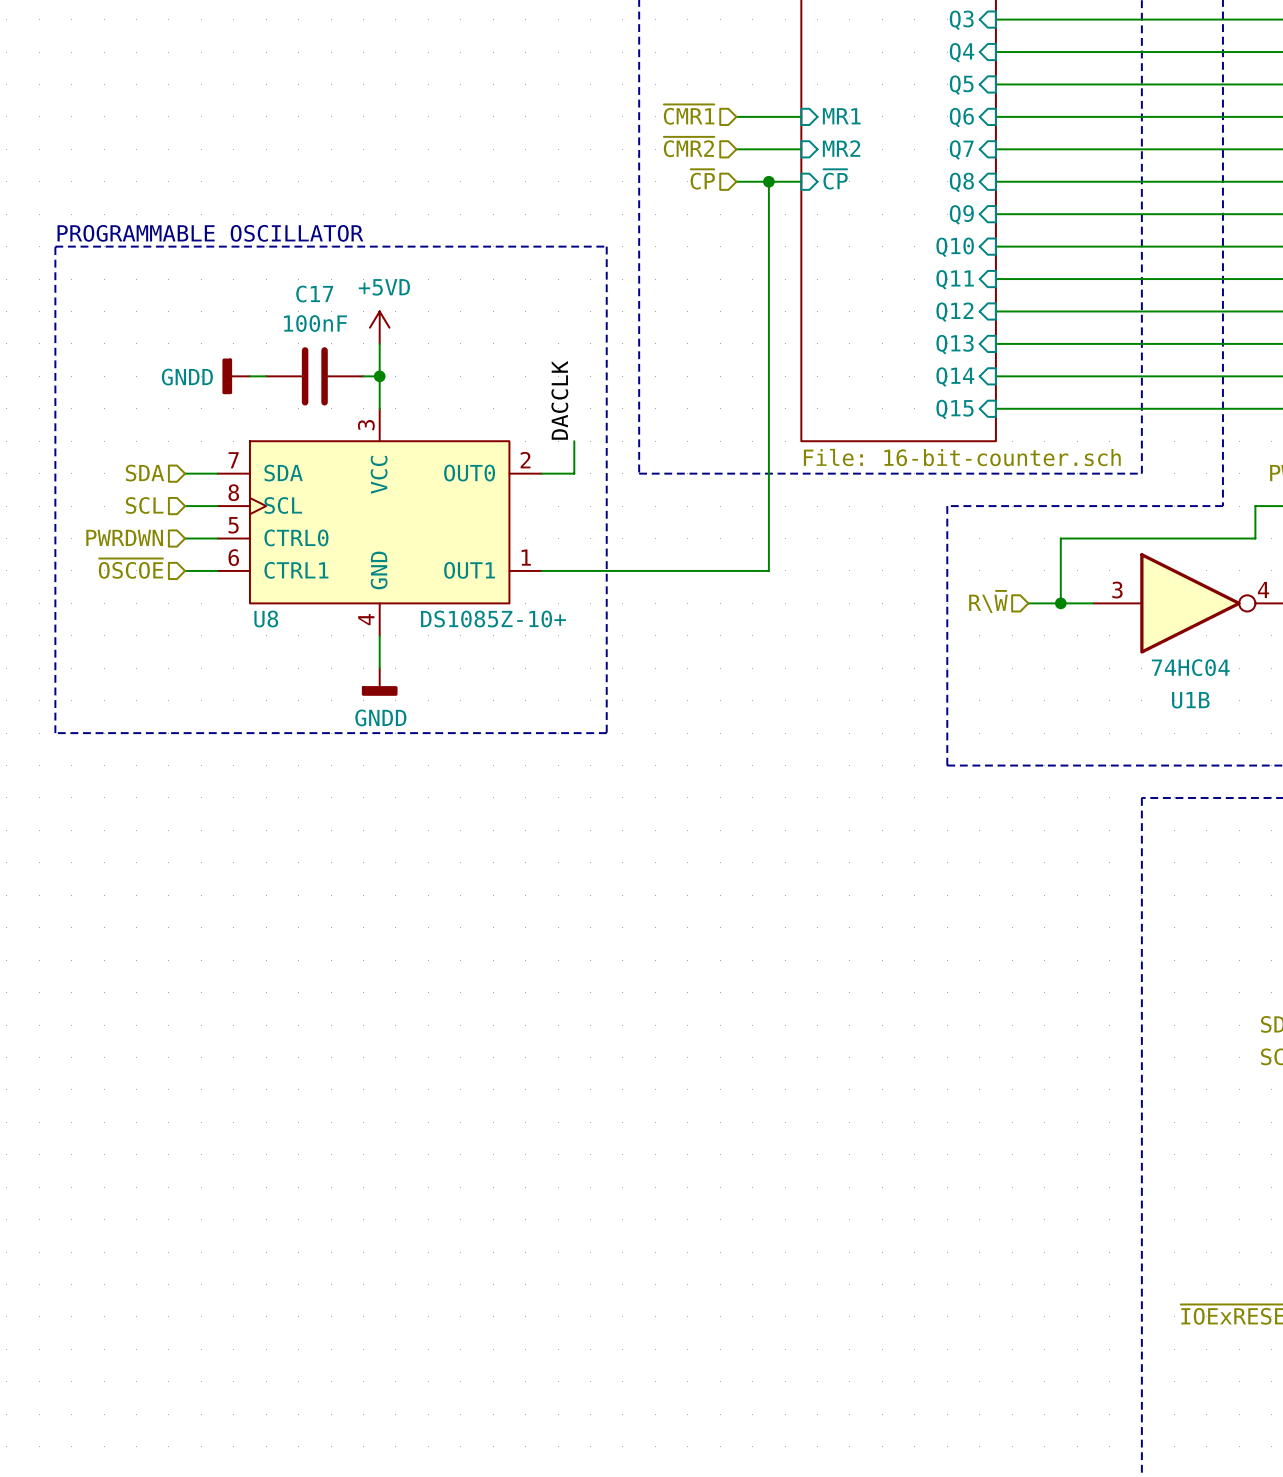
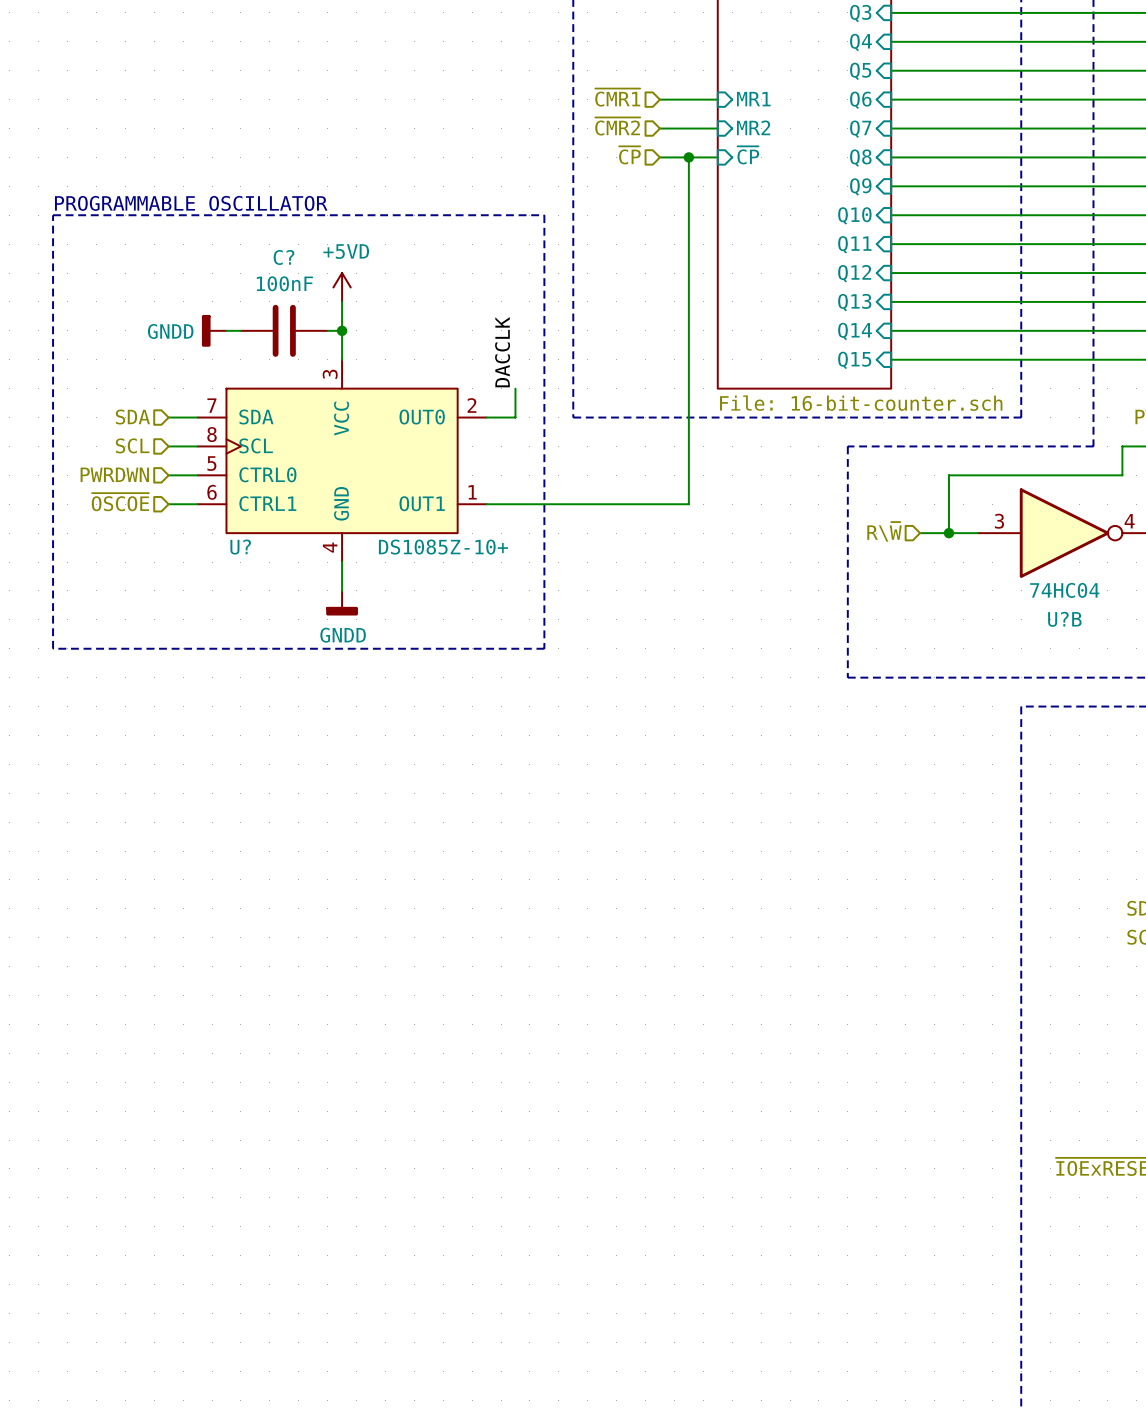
C17 name: C17 (314, 294) -> C? (284, 257)
U8 name: U8 (266, 619) -> U? (240, 547)
U1B name: U1B (1190, 700) -> U?B (1064, 619)

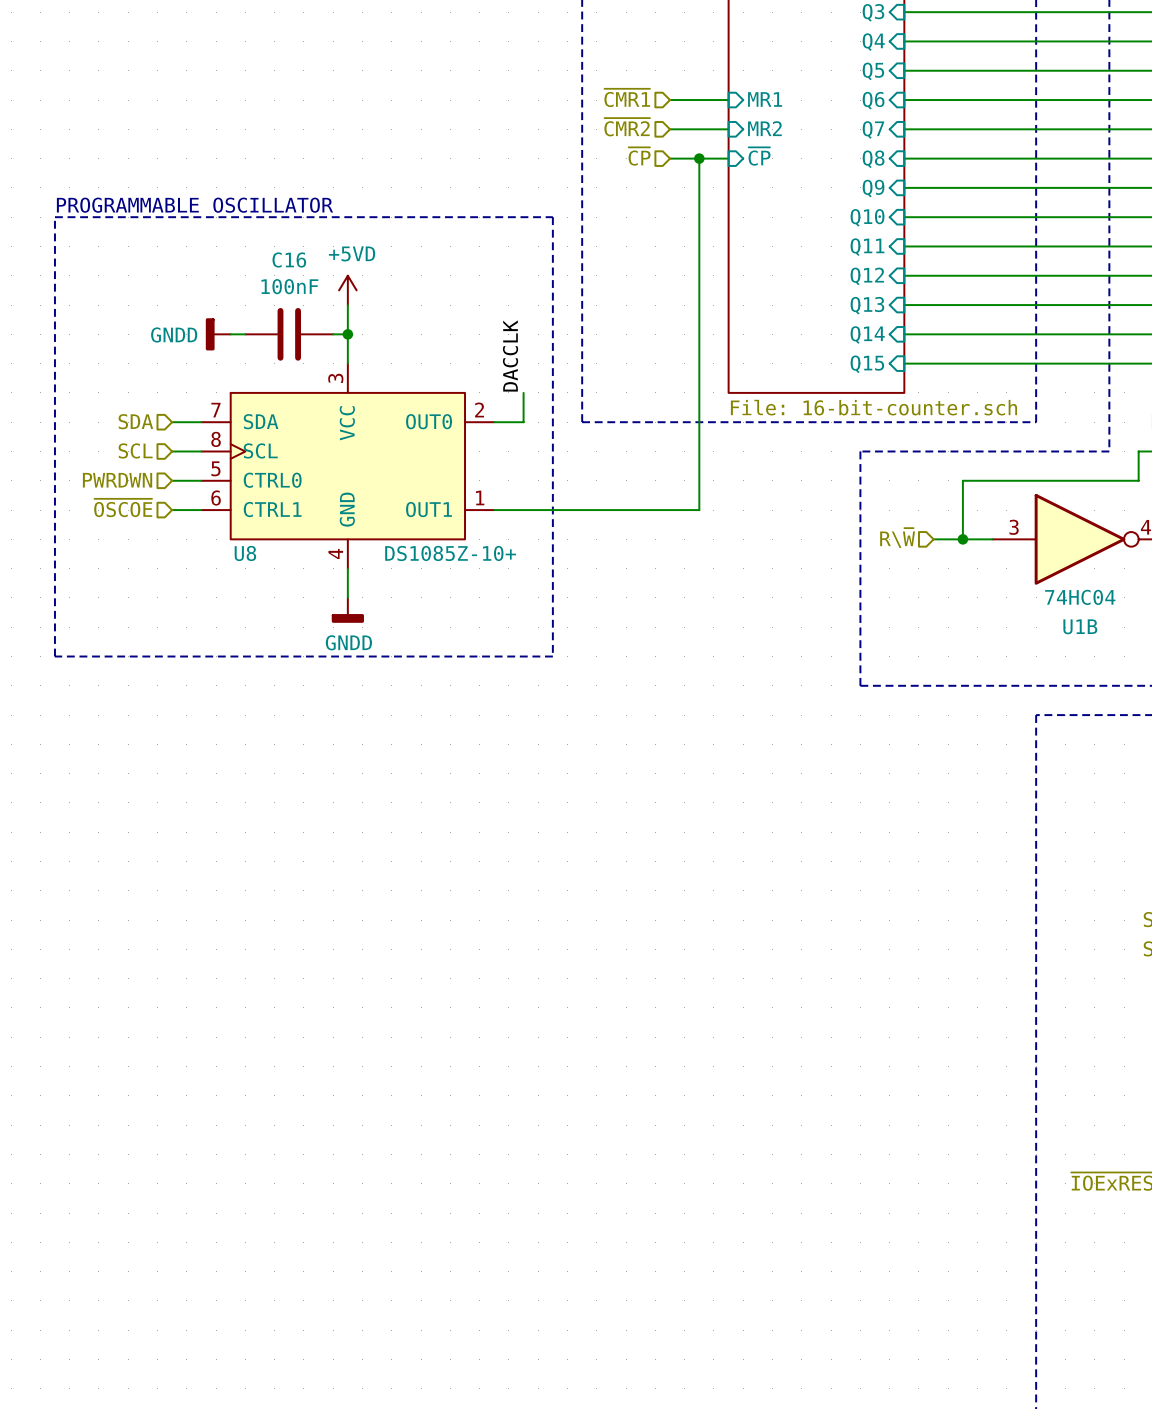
C? name: C? (284, 257) -> C16 (289, 259)
U? name: U? (240, 547) -> U8 (245, 553)
U?B name: U?B (1064, 619) -> U1B (1080, 626)

